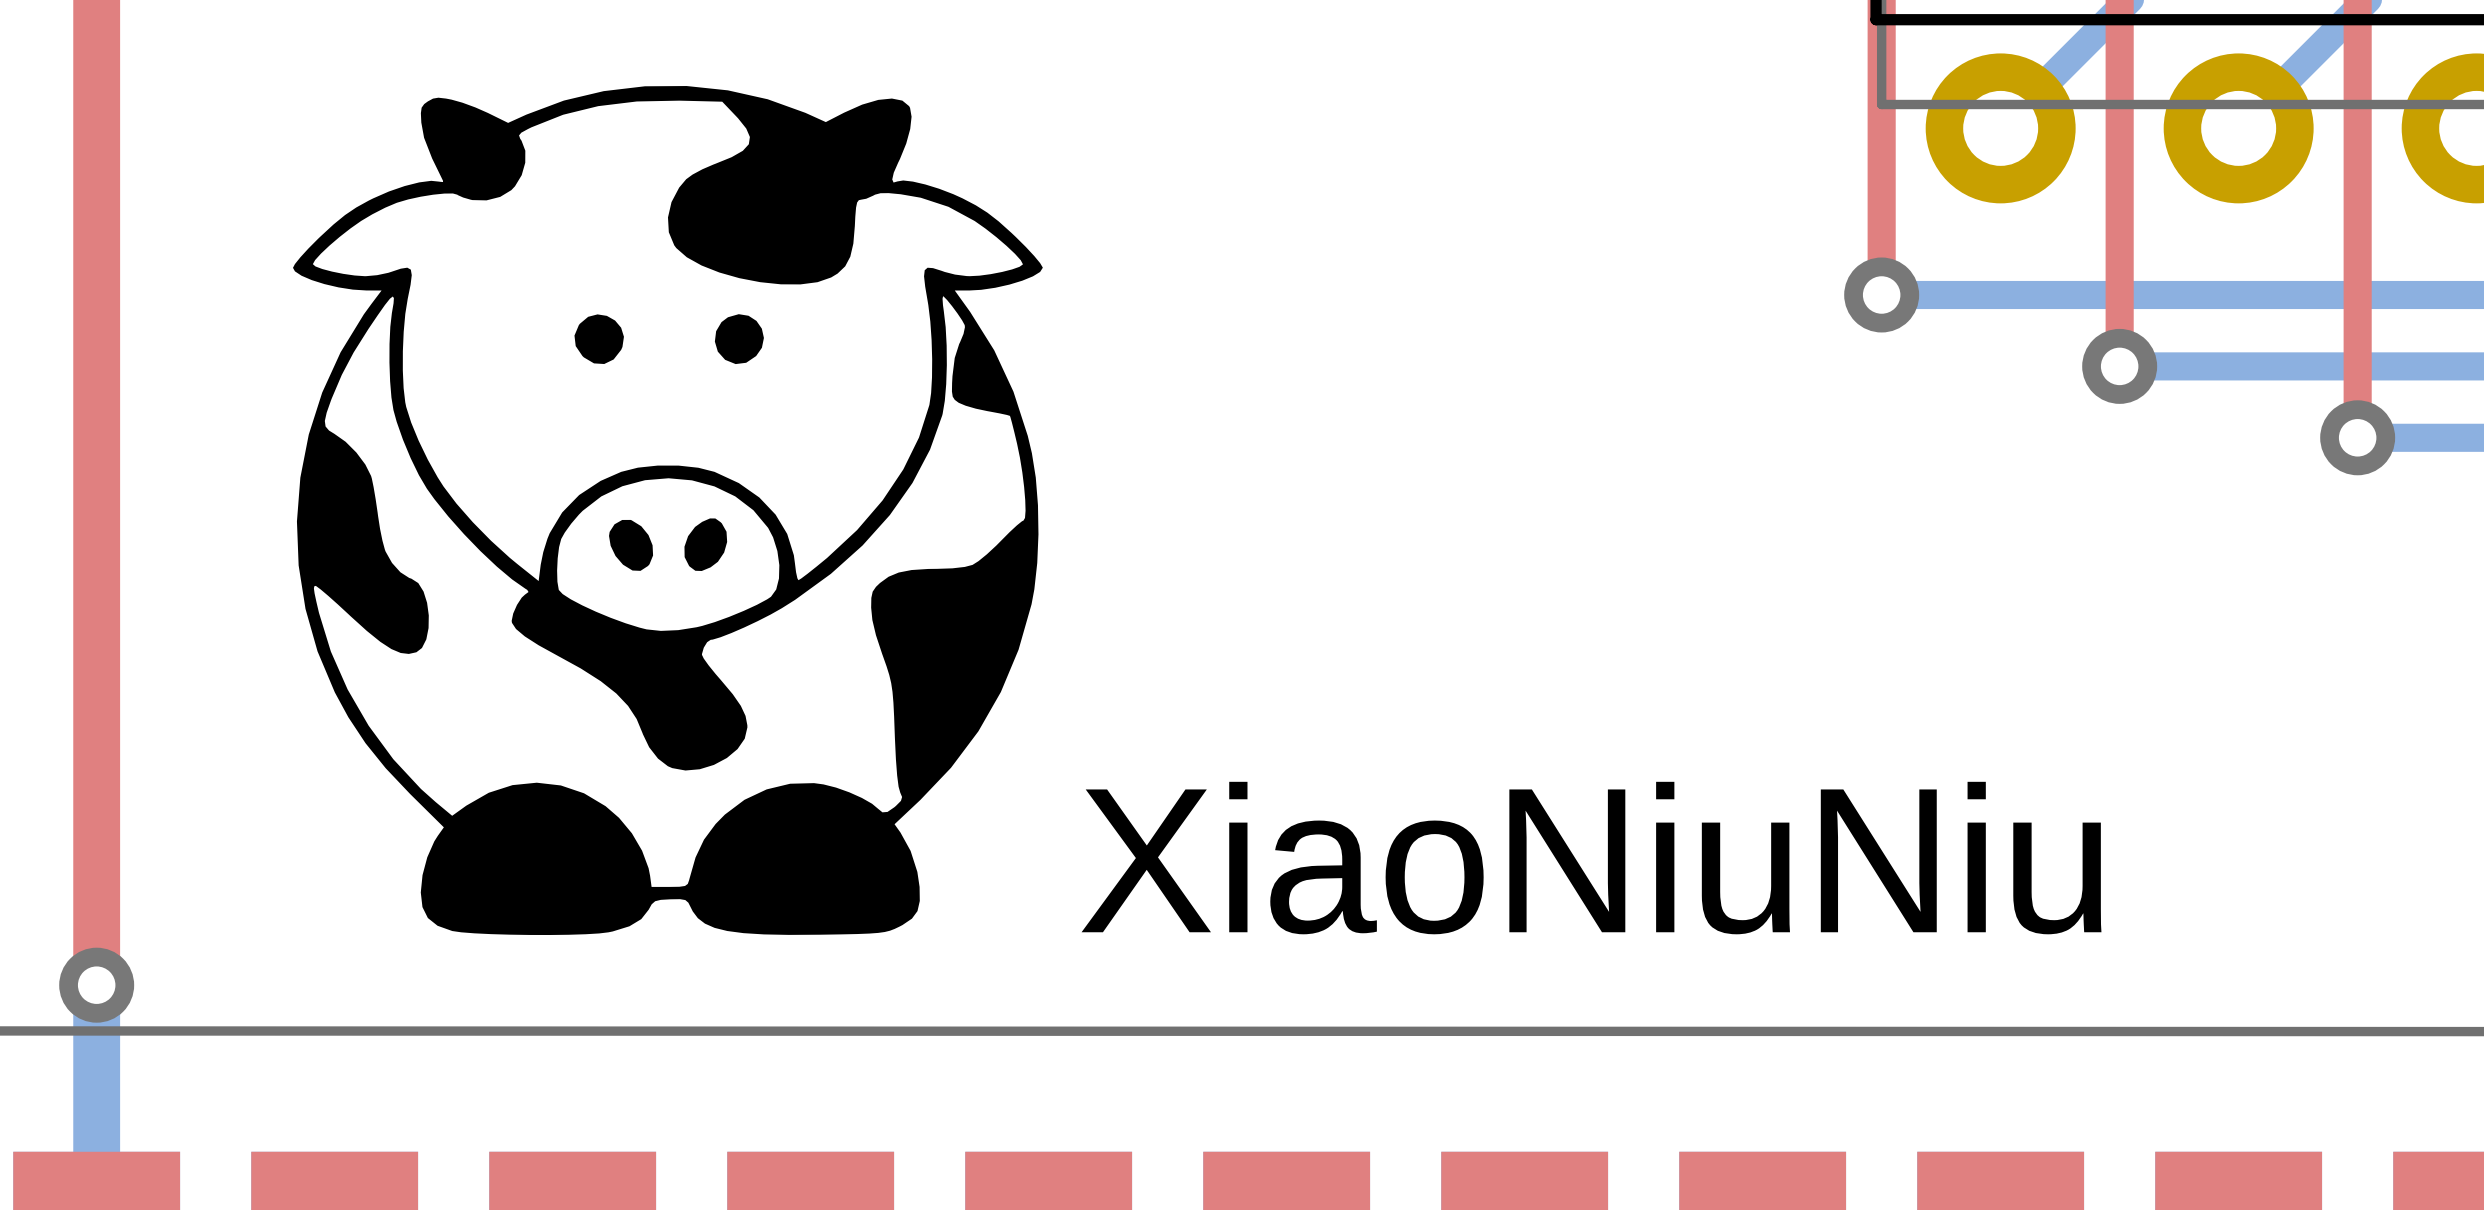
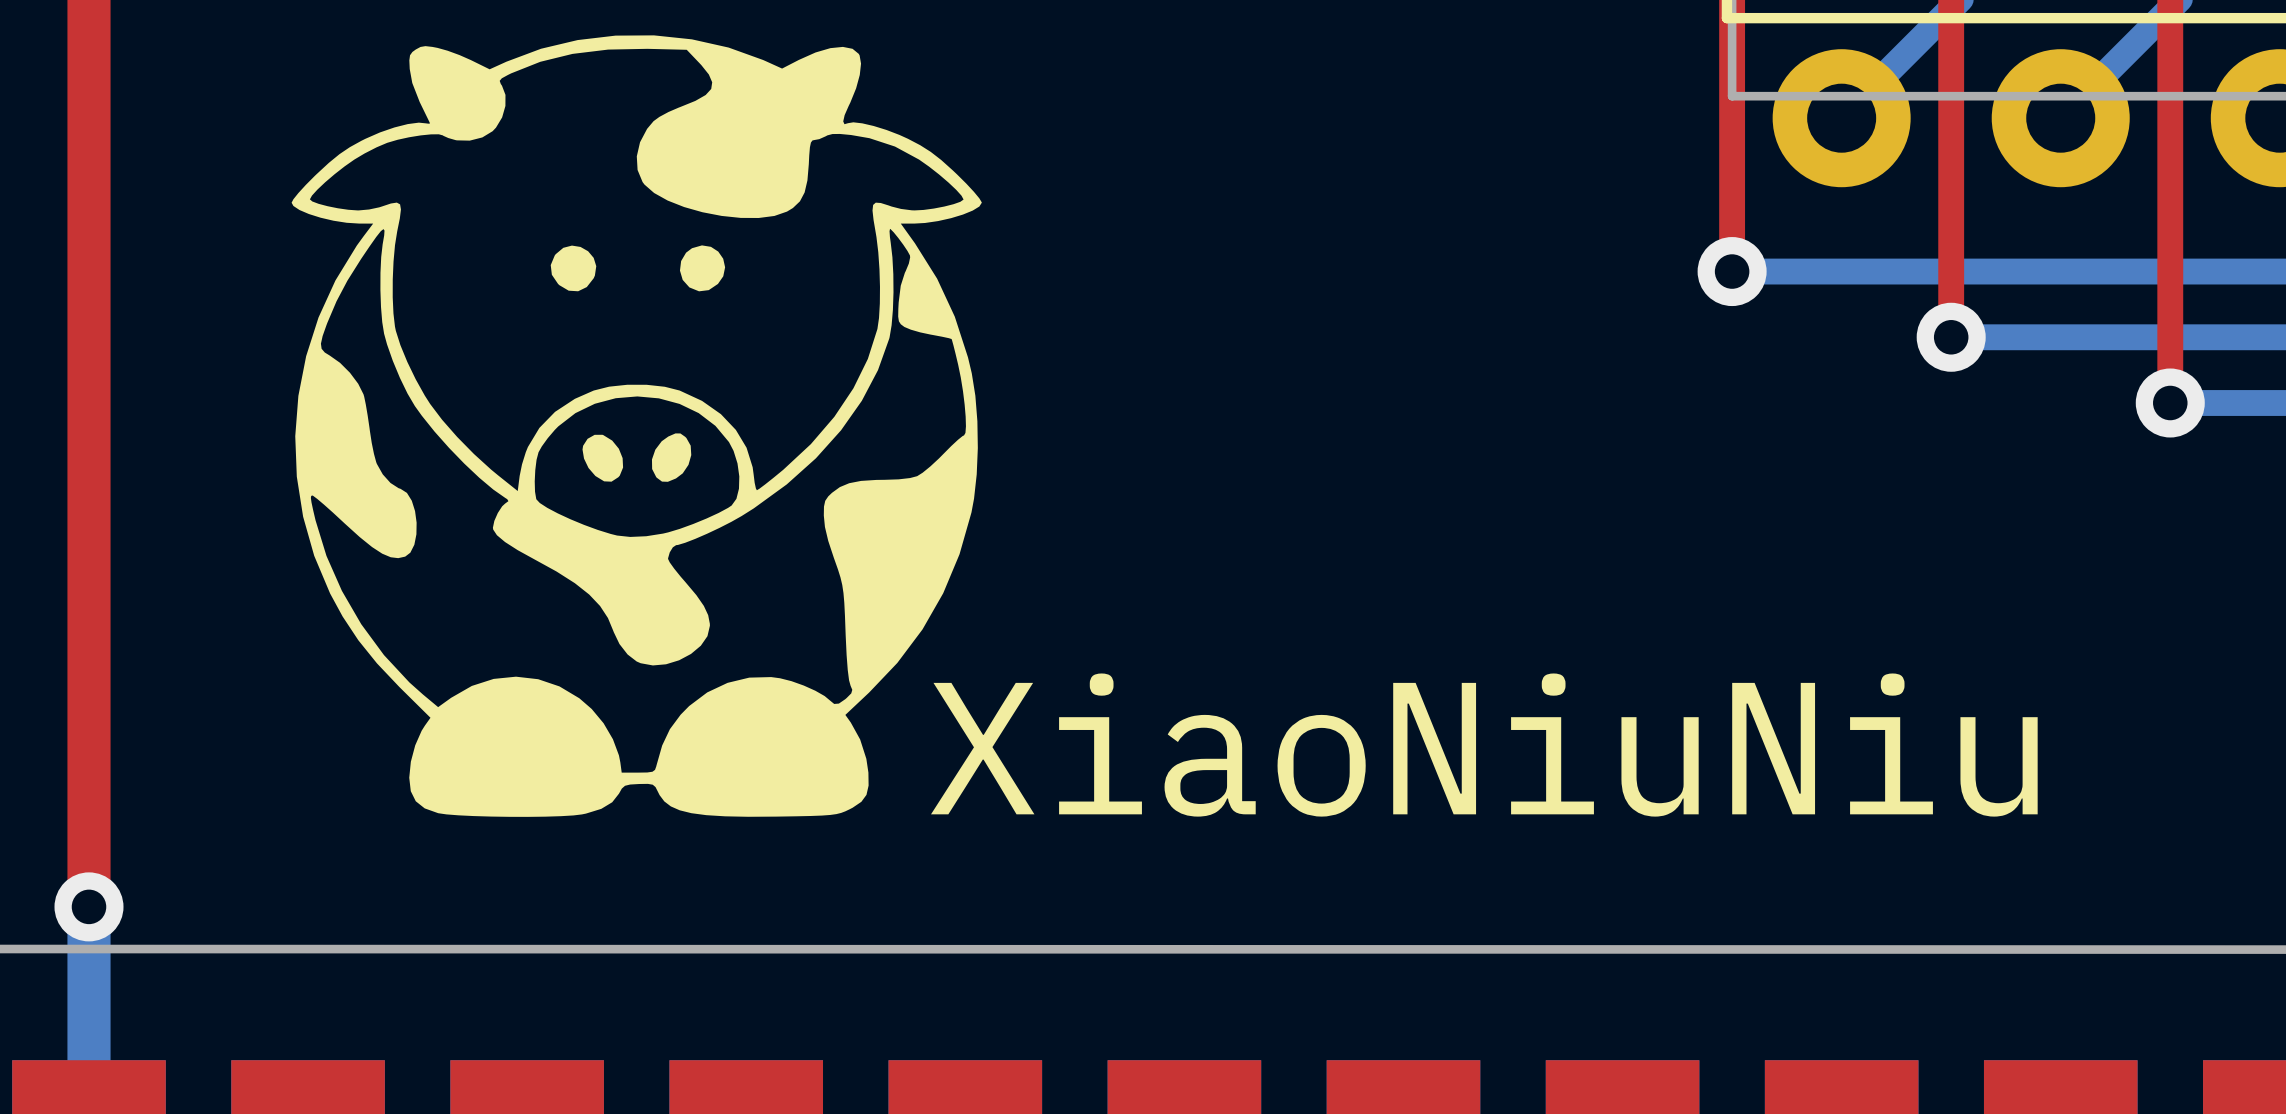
XiaoNiuNiu position: (667, 510) -> (636, 426)

